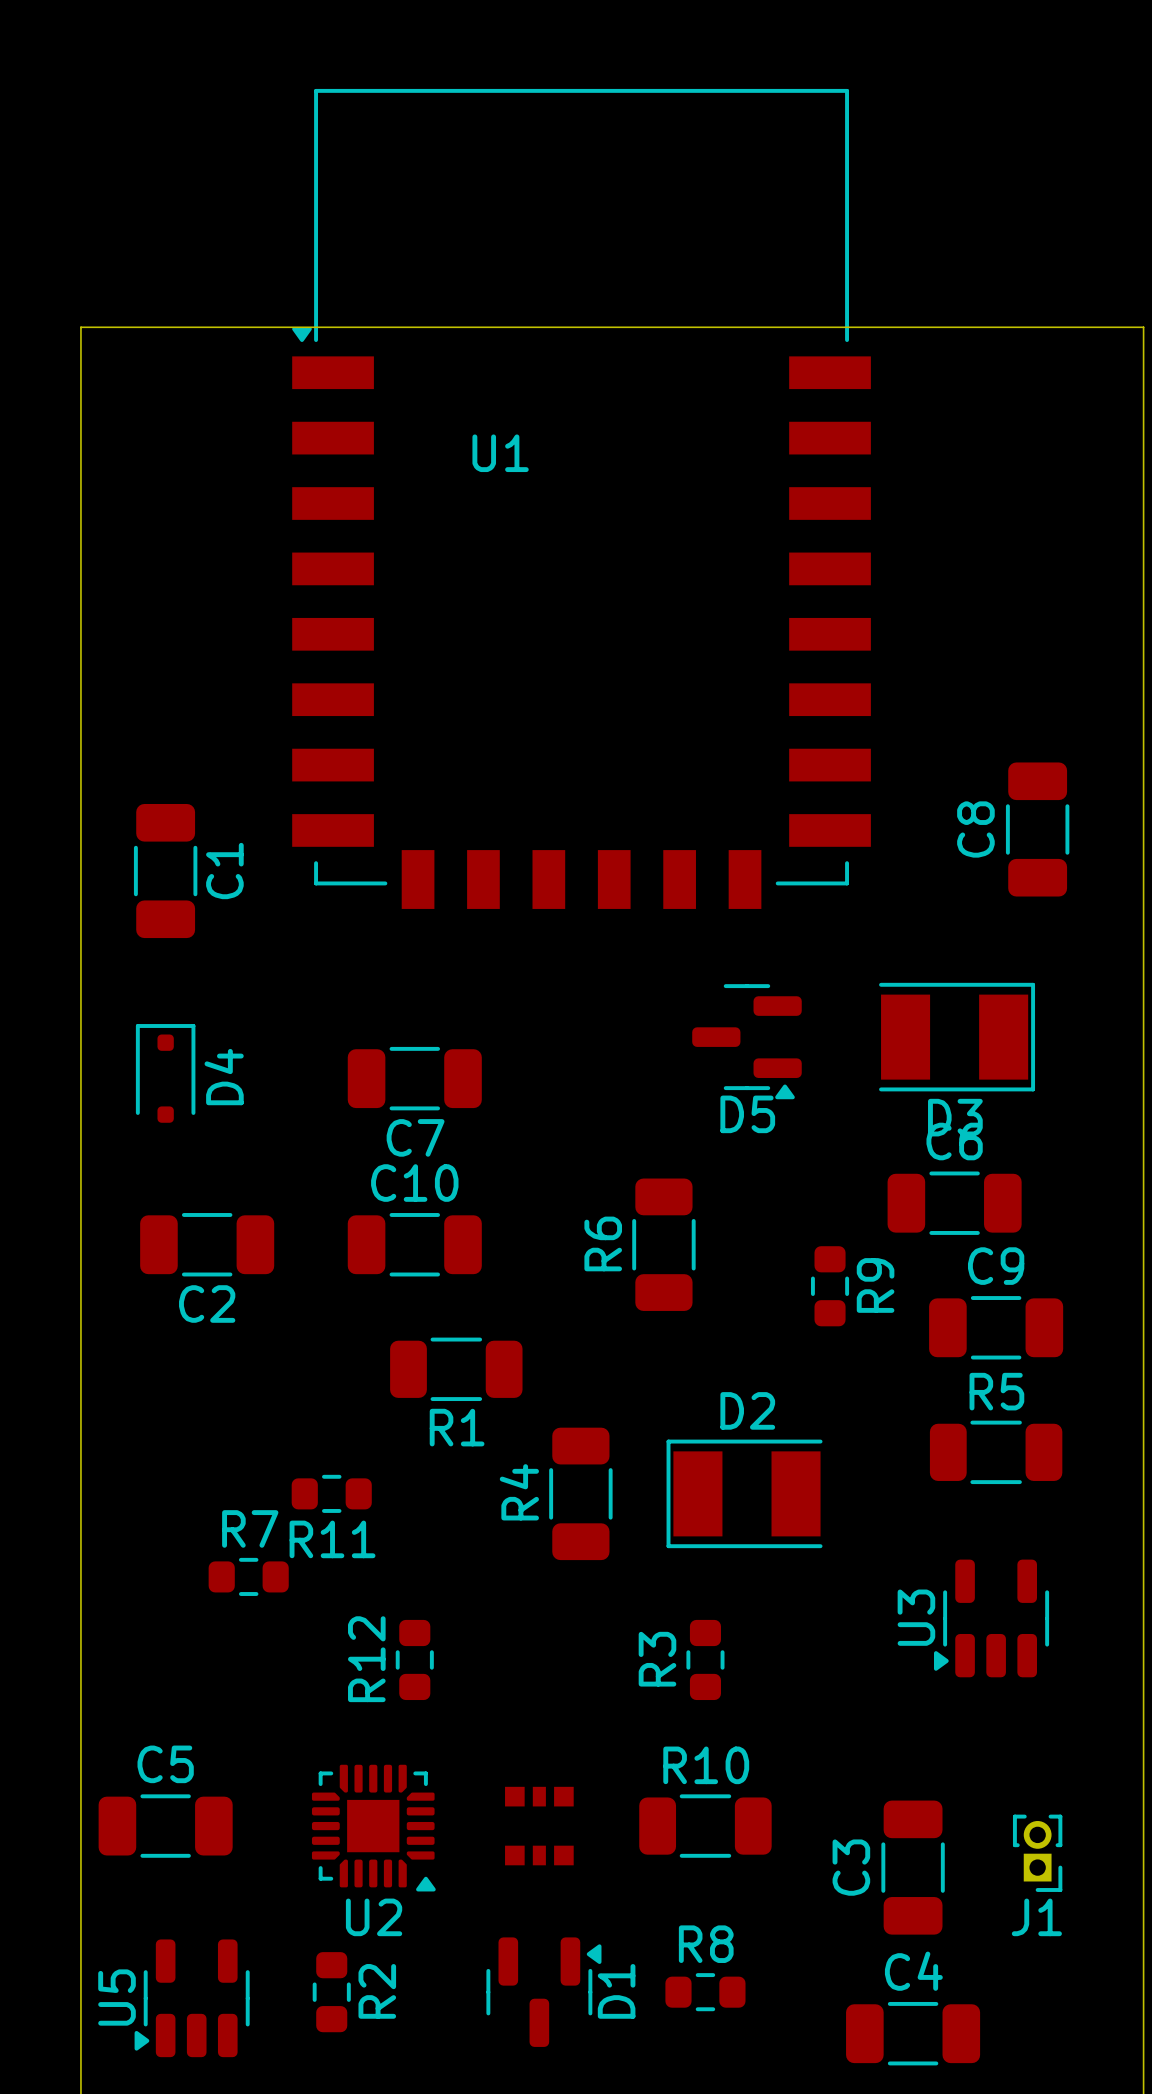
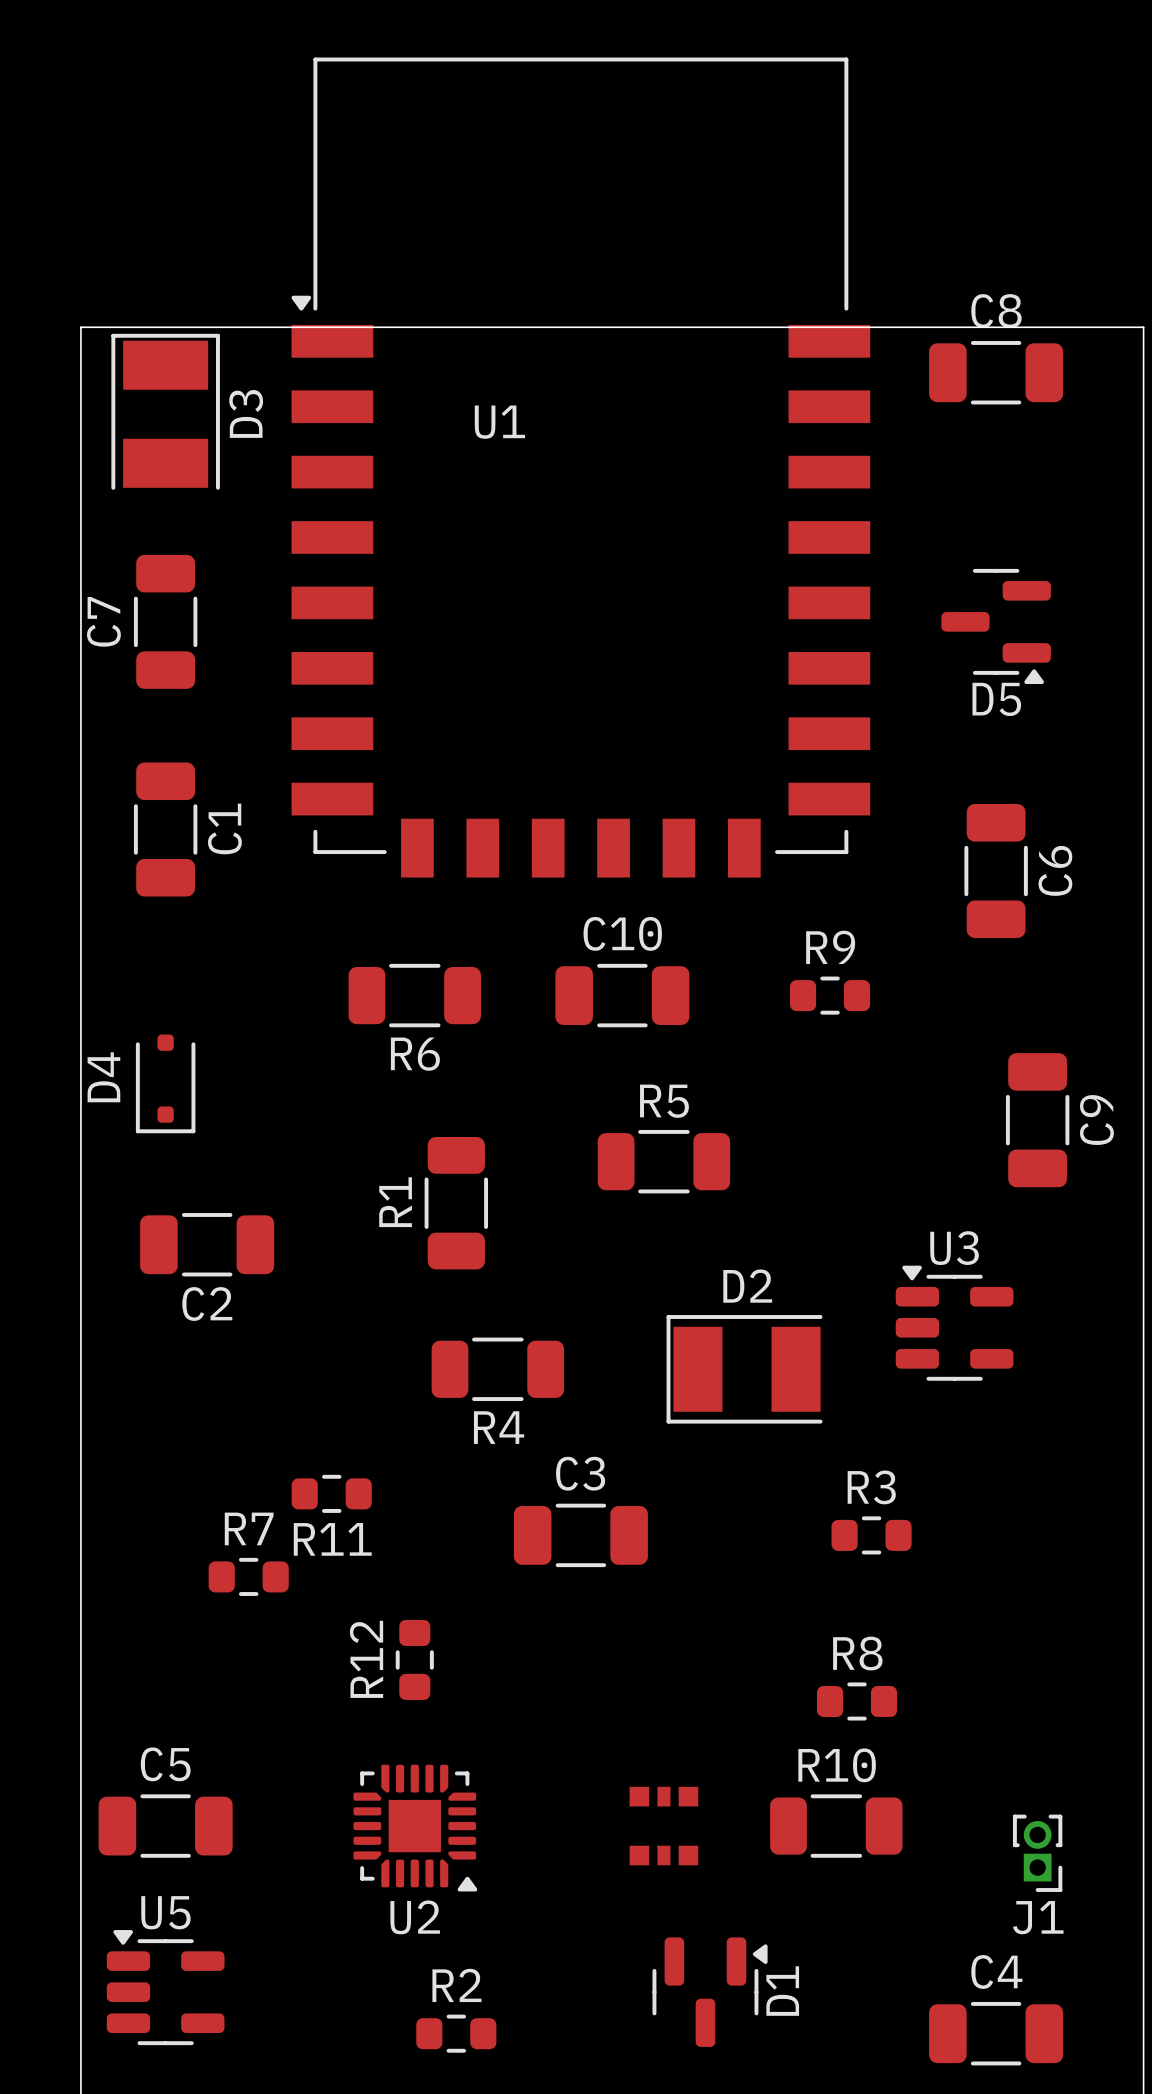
U1 position: (581, 498) -> (580, 467)
C8 rotation: 0° (1037, 829) -> 90° clockwise (996, 372)
C8 position: (1037, 829) -> (996, 372)
C1 position: (165, 871) -> (165, 829)
D3 rotation: 0° (957, 1037) -> 90° counterclockwise (165, 411)
D3 position: (957, 1037) -> (165, 411)
D5 position: (746, 1041) -> (996, 626)
D4 rotation: 0° (165, 1073) -> 180° (165, 1083)
C7 rotation: 0° (414, 1078) -> 90° clockwise (165, 621)
C7 position: (414, 1078) -> (165, 621)
C6 rotation: 0° (954, 1203) -> 90° clockwise (996, 871)
C6 position: (954, 1203) -> (996, 871)
R6 name position: R6 (603, 1243) -> R6 (415, 1054)
C10 position: (414, 1244) -> (622, 995)
R6 rotation: 0° (663, 1244) -> 90° clockwise (414, 995)
R6 position: (663, 1244) -> (414, 995)
R9 name position: R9 (875, 1285) -> R9 (830, 947)
R9 rotation: 0° (830, 1286) -> 90° clockwise (830, 995)
R9 position: (830, 1286) -> (830, 995)
C9 rotation: 0° (996, 1327) -> 90° clockwise (1037, 1120)
C9 position: (996, 1327) -> (1037, 1120)
R1 rotation: 0° (456, 1369) -> 90° clockwise (456, 1203)
R1 position: (456, 1369) -> (456, 1203)
R5 position: (996, 1452) -> (663, 1161)
R4 name position: R4 (519, 1492) -> R4 (499, 1427)
R4 rotation: 0° (580, 1493) -> 90° clockwise (497, 1369)
R4 position: (580, 1493) -> (497, 1369)
D2 position: (744, 1493) -> (744, 1369)
U3 rotation: 0° (991, 1618) -> 90° clockwise (954, 1323)
U3 position: (991, 1618) -> (954, 1323)
R3 rotation: 0° (705, 1659) -> 90° clockwise (871, 1535)
R3 position: (705, 1659) -> (871, 1535)
part position: (539, 1826) -> (663, 1826)
R10 position: (705, 1826) -> (836, 1826)
U2 position: (373, 1828) -> (415, 1828)
C3 rotation: 0° (913, 1867) -> 90° clockwise (580, 1535)
C3 position: (913, 1867) -> (580, 1535)
R2 name position: R2 (377, 1991) -> R2 (456, 1985)
R2 rotation: 0° (331, 1992) -> 90° clockwise (456, 2033)
R2 position: (331, 1992) -> (456, 2033)
D1 position: (543, 1992) -> (710, 1992)
R8 position: (705, 1992) -> (857, 1701)
U5 rotation: 0° (192, 1998) -> 90° clockwise (165, 1987)
C4 position: (913, 2033) -> (996, 2033)

